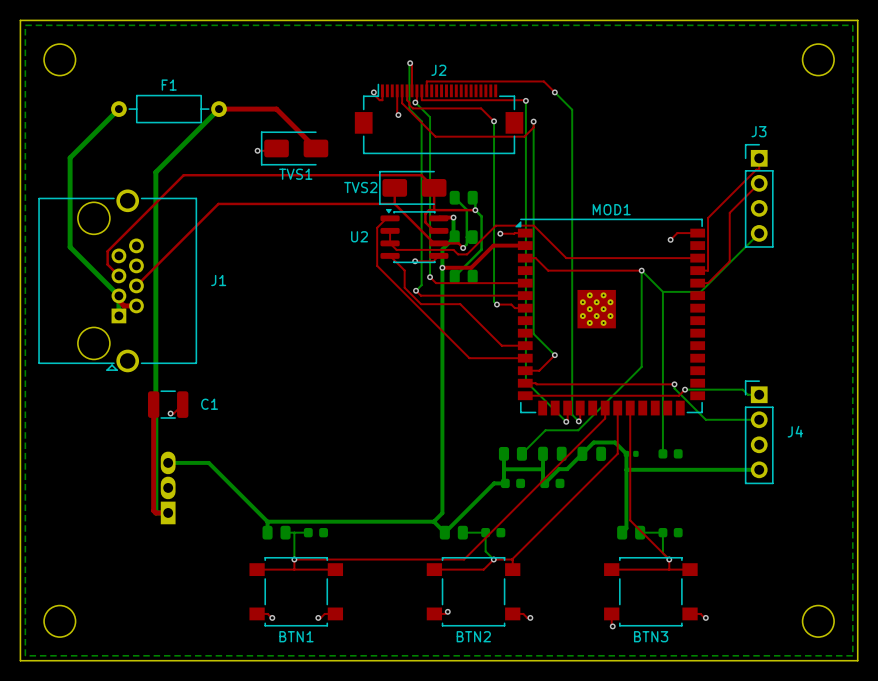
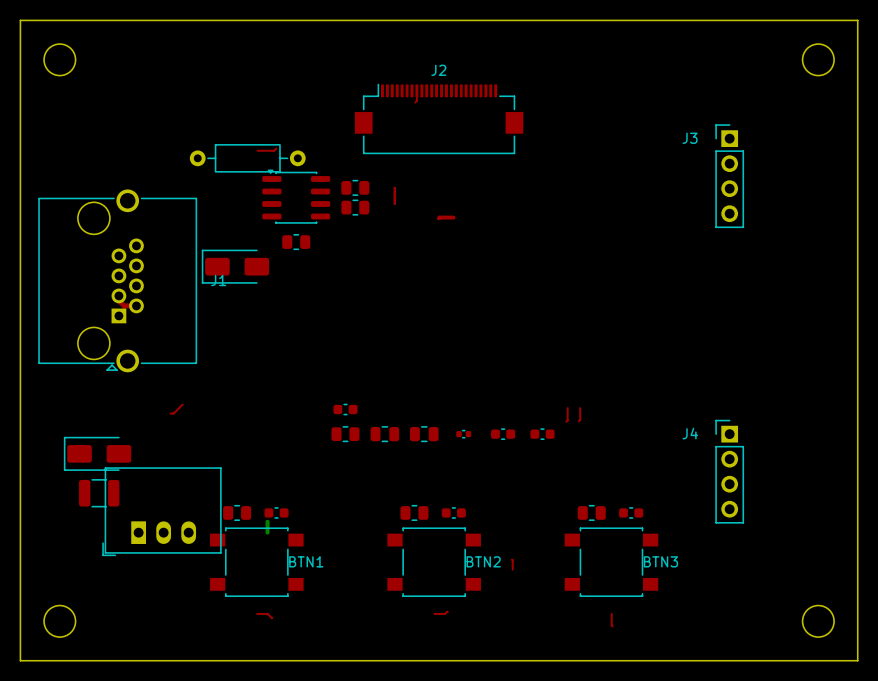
bottom zone outline: (25, 25) (852, 25) (852, 655) (25, 655) (25, 25) -> none
top track: (410, 63) (411, 65) (411, 90) -> none
bottom track: (410, 63) (409, 109) (421, 121) (421, 285) (416, 290) -> none
via: (410, 63) -> none
top track: (382, 90) (382, 100) (379, 100) (373, 92) -> none
top track: (397, 90) (398, 115) -> none
top track: (402, 90) (402, 103) (435, 136) (524, 136) (533, 127) (533, 121) -> none
top track: (407, 90) (407, 100) (412, 108) (481, 108) (494, 121) -> none
top track: (421, 90) (421, 100) (525, 100) -> none
top track: (426, 90) (426, 81) (543, 81) (554, 92) -> none
via: (373, 92) -> none
bottom track: (554, 92) (572, 109) (572, 414) (578, 421) -> none
via: (554, 92) -> none
bottom track: (525, 100) (525, 381) (566, 421) -> none
via: (525, 100) -> none
bottom track: (415, 102) (430, 117) (430, 277) -> none
via: (415, 102) -> none
bottom track: (118, 109) (70, 157) (70, 247) (118, 295) (118, 315) -> none
F1: (168, 109) -> none
top track: (219, 109) (276, 109) (315, 148) -> none
bottom track: (219, 109) (155, 172) (155, 512) (168, 512) -> none
via: (398, 115) -> none
bottom track: (494, 121) (494, 301) (496, 304) -> none
via: (494, 121) -> none
bottom track: (533, 121) (533, 333) (554, 355) -> none
via: (533, 121) -> none
TVS1: (294, 148) -> none
via: (257, 150) -> none
part: none -> (247, 158)
top track: (759, 158) (759, 169) (756, 169) (708, 218) (708, 270) (697, 270) -> none
part: none -> (729, 176)
top track: (759, 183) (729, 212) (729, 261) (708, 283) (697, 283) -> none
part: none -> (355, 187)
TVS2: (412, 187) -> none
J3: (759, 195) -> none
part: none -> (296, 196)
bottom track: (454, 197) (466, 209) (466, 244) (463, 247) -> none
part: (463, 197) -> none
bottom track: (472, 197) (475, 200) (475, 210) (481, 216) (481, 249) (454, 276) -> none
part: none -> (355, 207)
top track: (434, 210) (434, 187) (421, 175) (183, 175) (107, 251) (107, 264) (118, 275) -> none
top track: (475, 210) (429, 210) (425, 213) (425, 222) (433, 230) (438, 230) -> none
via: (475, 210) -> none
bottom track: (453, 217) (453, 238) -> none
via: (453, 217) -> none
top track: (390, 218) (386, 218) (377, 227) (377, 265) (469, 358) (525, 358) -> none
top track: (390, 230) (390, 243) (396, 249) (453, 249) (458, 254) (467, 254) (495, 225) (533, 225) (566, 258) (697, 258) -> none
via: (500, 233) -> none
top track: (525, 233) (500, 233) -> none
top track: (697, 233) (677, 233) (670, 239) -> none
bottom track: (759, 233) (700, 291) (662, 291) -> none
U2: (414, 235) -> none
bottom track: (454, 237) (442, 249) (442, 513) (433, 521) -> none
part: (463, 237) -> none
via: (670, 239) -> none
part: none -> (296, 242)
top track: (525, 245) (493, 245) (471, 267) (442, 267) -> none
top track: (463, 247) (458, 243) (434, 243) (394, 203) (218, 203) (136, 285) -> none
via: (463, 247) -> none
top track: (390, 255) (404, 270) (404, 287) (421, 304) (460, 304) (501, 345) (525, 345) -> none
top track: (438, 255) (433, 261) (415, 261) -> none
top track: (525, 258) (535, 258) (548, 270) (641, 270) -> none
via: (415, 261) -> none
part: none -> (235, 266)
via: (442, 267) -> none
via: (641, 270) -> none
part: (463, 276) -> none
top track: (430, 277) (436, 283) (525, 283) -> none
via: (430, 277) -> none
top track: (416, 290) (420, 295) (525, 295) -> none
via: (416, 290) -> none
bottom track: (662, 291) (662, 453) -> none
bottom track: (662, 291) (641, 270) (641, 366) (578, 430) (545, 430) (521, 453) -> none
top track: (496, 304) (511, 304) (514, 308) (525, 308) -> none
via: (496, 304) -> none
MOD1: (610, 317) -> none
top track: (554, 355) (539, 370) (525, 370) -> none
via: (554, 355) -> none
top track: (525, 383) (674, 384) -> none
bottom track: (674, 384) (674, 388) (705, 419) (759, 419) -> none
via: (674, 384) -> none
top track: (685, 389) (678, 395) (525, 395) -> none
bottom track: (685, 389) (742, 389) (747, 394) (759, 394) -> none
via: (685, 389) -> none
top track: (153, 404) (153, 510) (155, 512) (168, 512) -> none
C1: (168, 404) -> none
top track: (605, 408) (605, 418) (464, 559) (294, 559) (294, 569) -> none
top track: (617, 408) (617, 453) (512, 559) (493, 559) (483, 569) (434, 569) -> none
top track: (630, 408) (630, 520) (669, 559) (669, 569) -> none
part: none -> (345, 409)
via: (170, 413) -> none
via: (566, 421) -> none
via: (578, 421) -> none
J4: (759, 432) -> none
part: none -> (345, 434)
part: none -> (384, 434)
part: none -> (424, 434)
part: none -> (463, 434)
part: none -> (503, 434)
part: none -> (542, 434)
part: none -> (97, 453)
bottom track: (503, 453) (503, 483) -> none
part: (512, 453) -> none
bottom track: (543, 453) (543, 481) (544, 483) (558, 469) (567, 469) (593, 442) (615, 442) (626, 453) (626, 528) (622, 532) -> none
part: (552, 453) -> none
part: (591, 453) -> none
part: (631, 453) -> none
part: (670, 453) -> none
bottom track: (168, 462) (208, 462) (267, 521) (433, 521) -> none
bottom track: (503, 469) (543, 469) -> none
bottom track: (626, 469) (759, 469) -> none
part: none -> (729, 471)
bottom track: (505, 483) (494, 483) (444, 532) (433, 521) -> none
part: (512, 483) -> none
part: (552, 483) -> none
part: (168, 487) -> none
part: none -> (99, 493)
part: none -> (161, 511)
part: none -> (237, 512)
part: none -> (276, 512)
part: none -> (414, 512)
part: none -> (453, 512)
part: none -> (591, 512)
part: none -> (631, 512)
part: (276, 532) -> none
bottom track: (285, 532) (308, 532) -> none
bottom track: (294, 532) (294, 559) -> none
part: (315, 532) -> none
part: (453, 532) -> none
bottom track: (462, 532) (485, 532) (485, 551) (493, 559) -> none
part: (493, 532) -> none
part: (631, 532) -> none
bottom track: (640, 532) (662, 532) (662, 553) (669, 559) -> none
part: (670, 532) -> none
via: (294, 559) -> none
via: (493, 559) -> none
via: (669, 559) -> none
part: none -> (256, 562)
part: none -> (434, 562)
part: none -> (611, 562)
top track: (257, 569) (335, 569) -> none
top track: (611, 569) (690, 569) -> none
BTN1: (296, 591) -> none
BTN2: (473, 591) -> none
BTN3: (650, 591) -> none
via: (447, 611) -> none
top track: (335, 613) (324, 613) (318, 617) -> none
top track: (512, 613) (523, 613) (527, 617) (530, 617) -> none
top track: (690, 613) (700, 613) (705, 617) -> none
via: (272, 617) -> none
via: (318, 617) -> none
via: (530, 617) -> none
via: (705, 617) -> none
via: (612, 626) -> none

